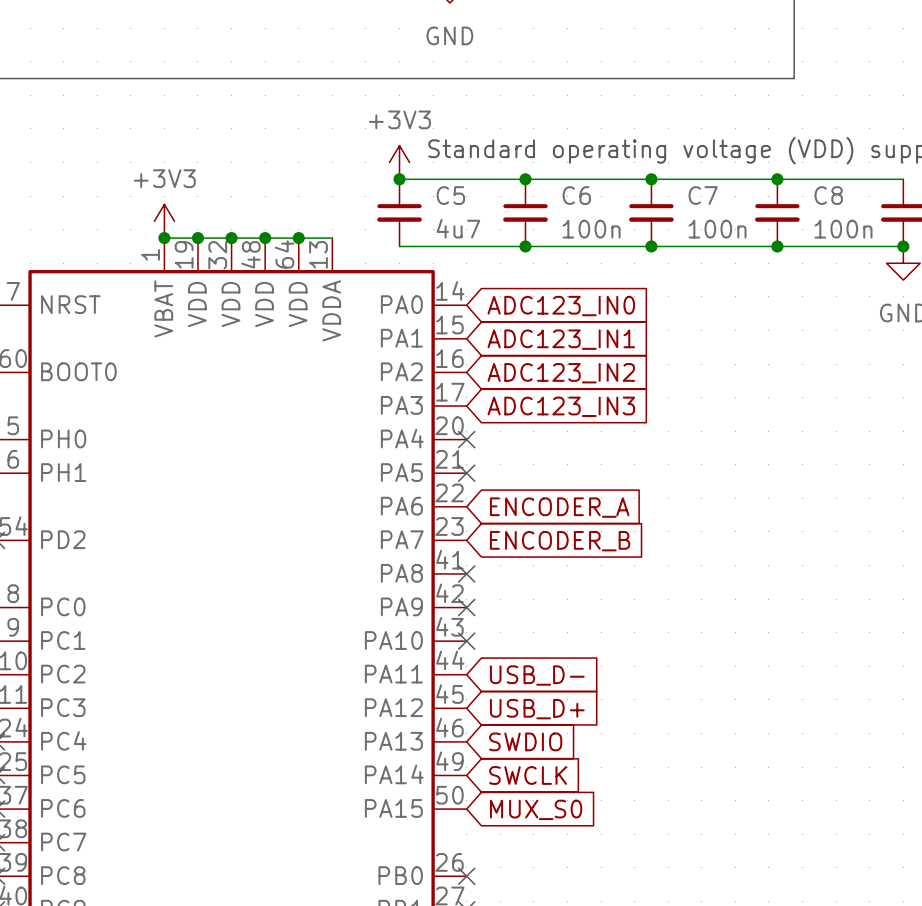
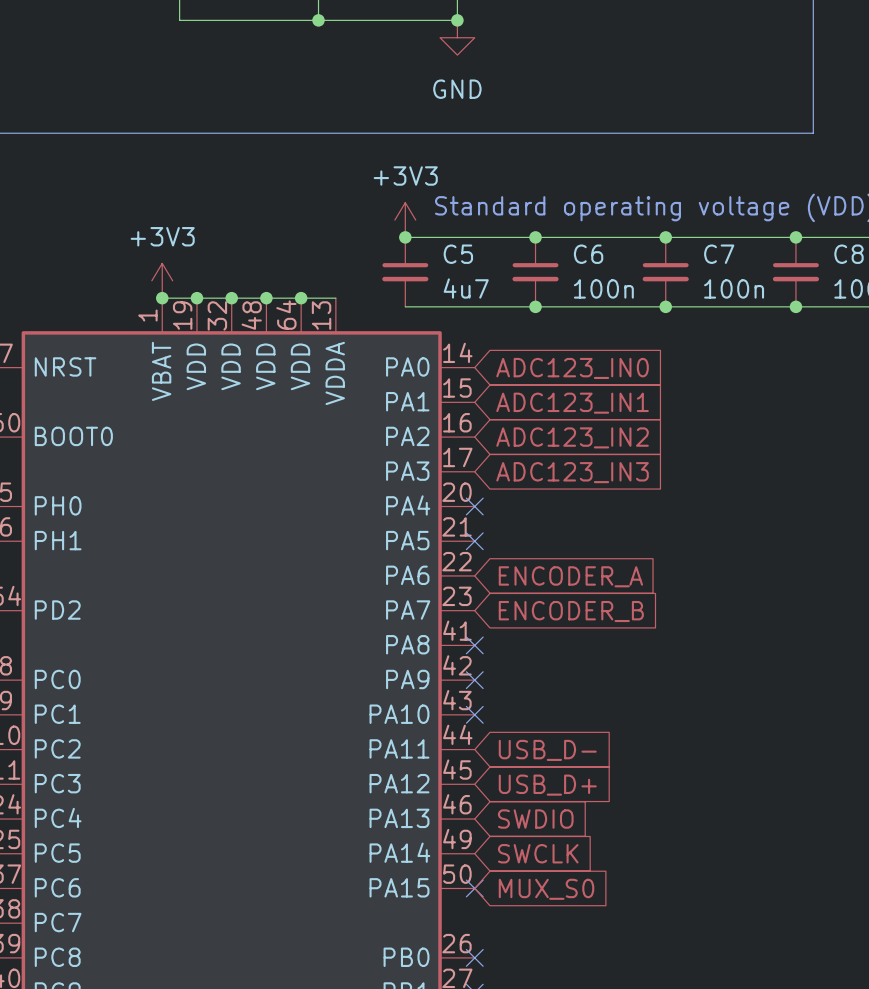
no-connect mark: none -> (474, 888)

